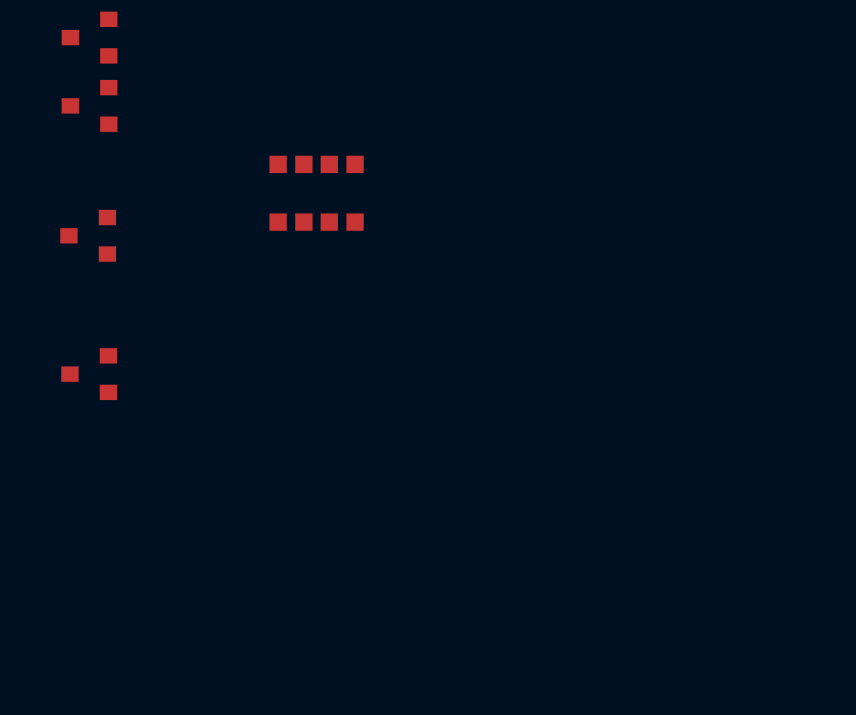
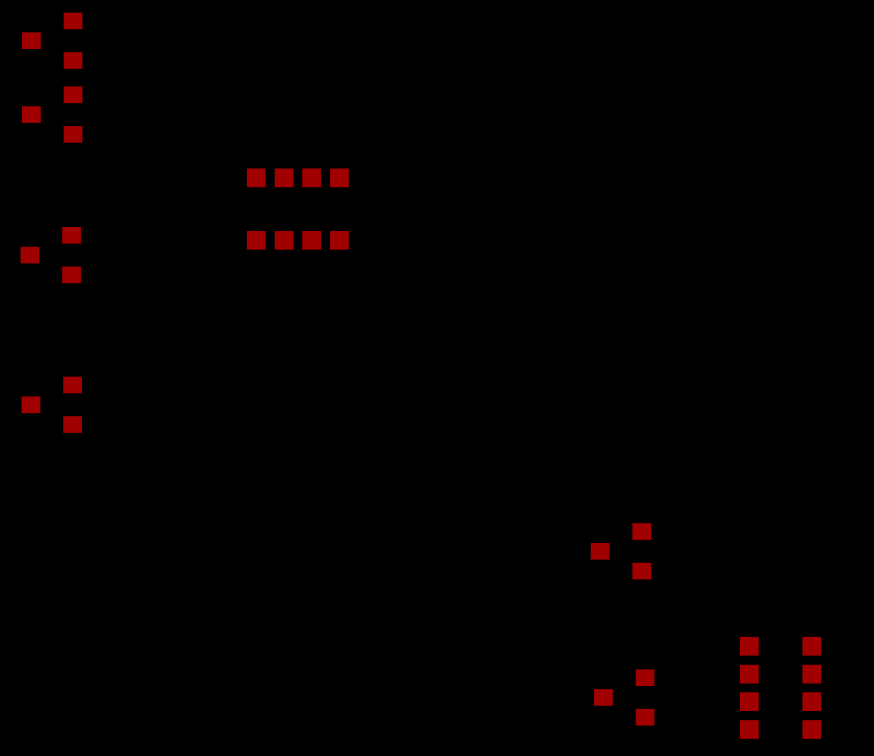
part: none -> (620, 551)
part: none -> (780, 687)
part: none -> (624, 697)

